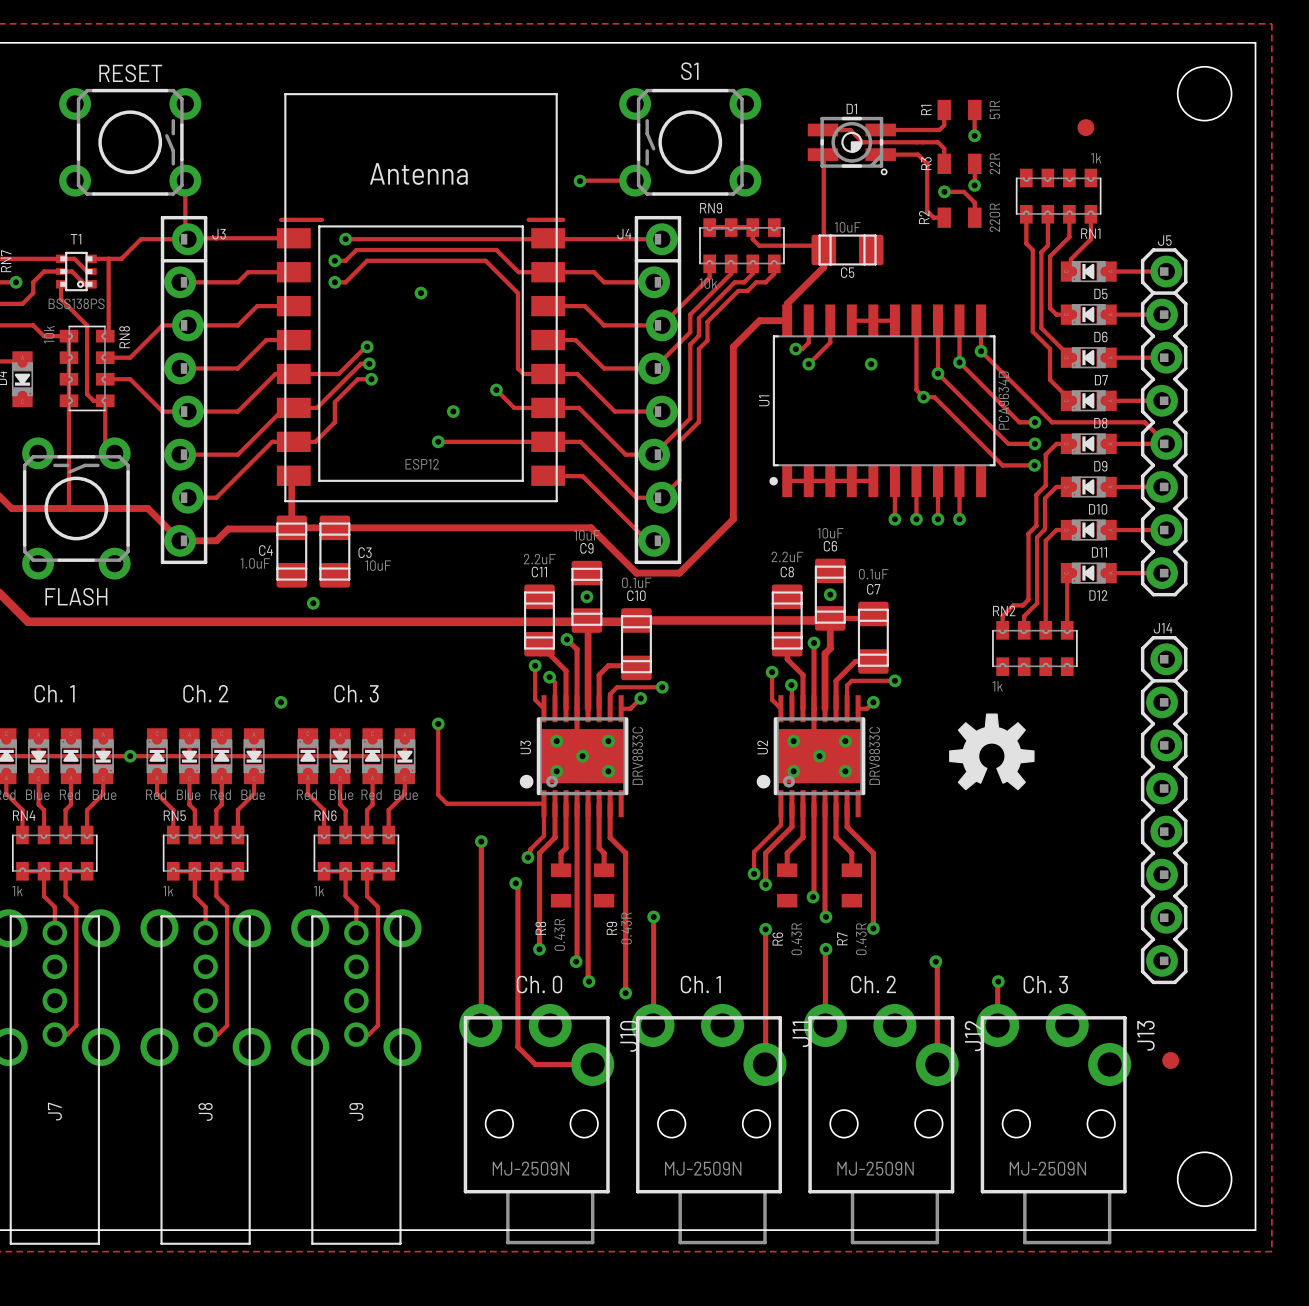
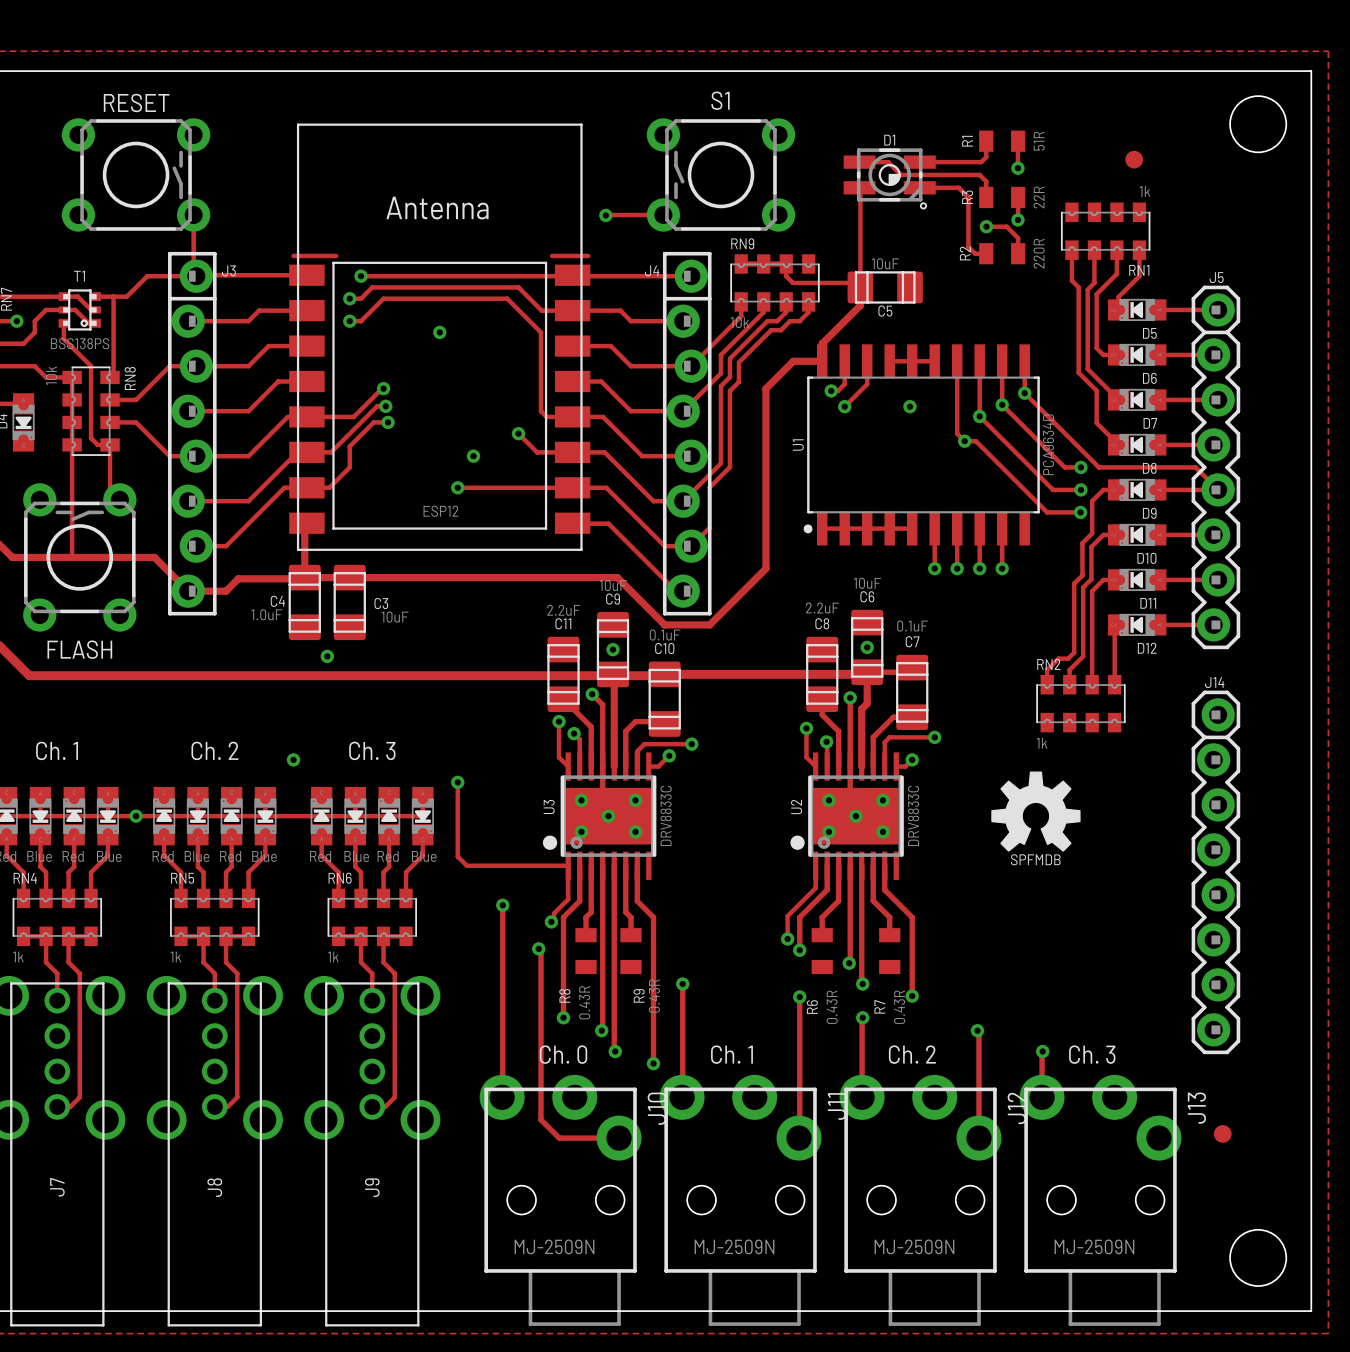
text: none -> SPFMDB (1035, 859)

